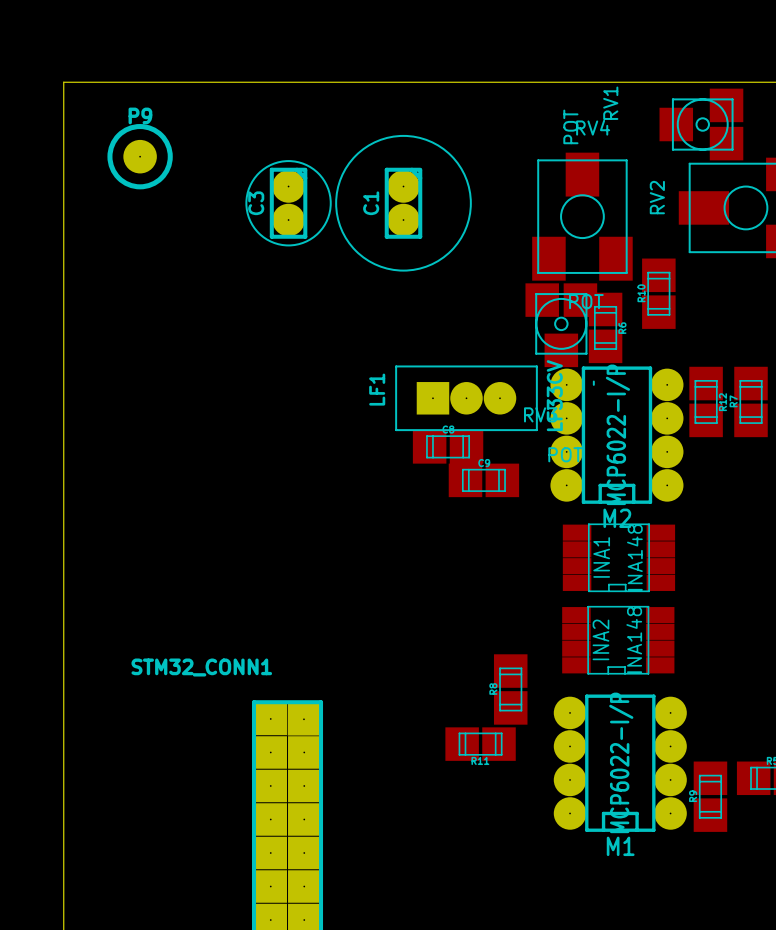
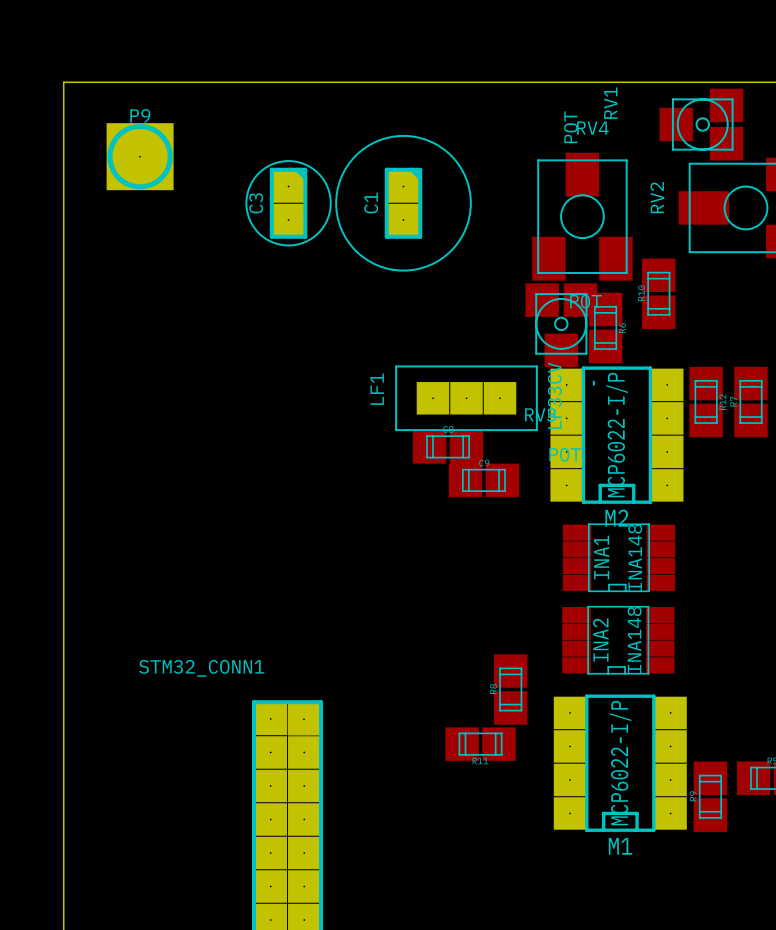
P9 footprint: [107, 124, 173, 190] -> [106, 123, 174, 191]
C1 footprint: [335, 134, 472, 272] -> [335, 134, 472, 272]
C3 footprint: [245, 160, 332, 247] -> [245, 160, 332, 247]
LF1 footprint: [395, 365, 595, 432] -> [395, 365, 595, 432]
M2 footprint: [550, 366, 684, 504] -> [550, 366, 684, 504]
M1 footprint: [553, 694, 687, 832] -> [553, 694, 687, 832]

